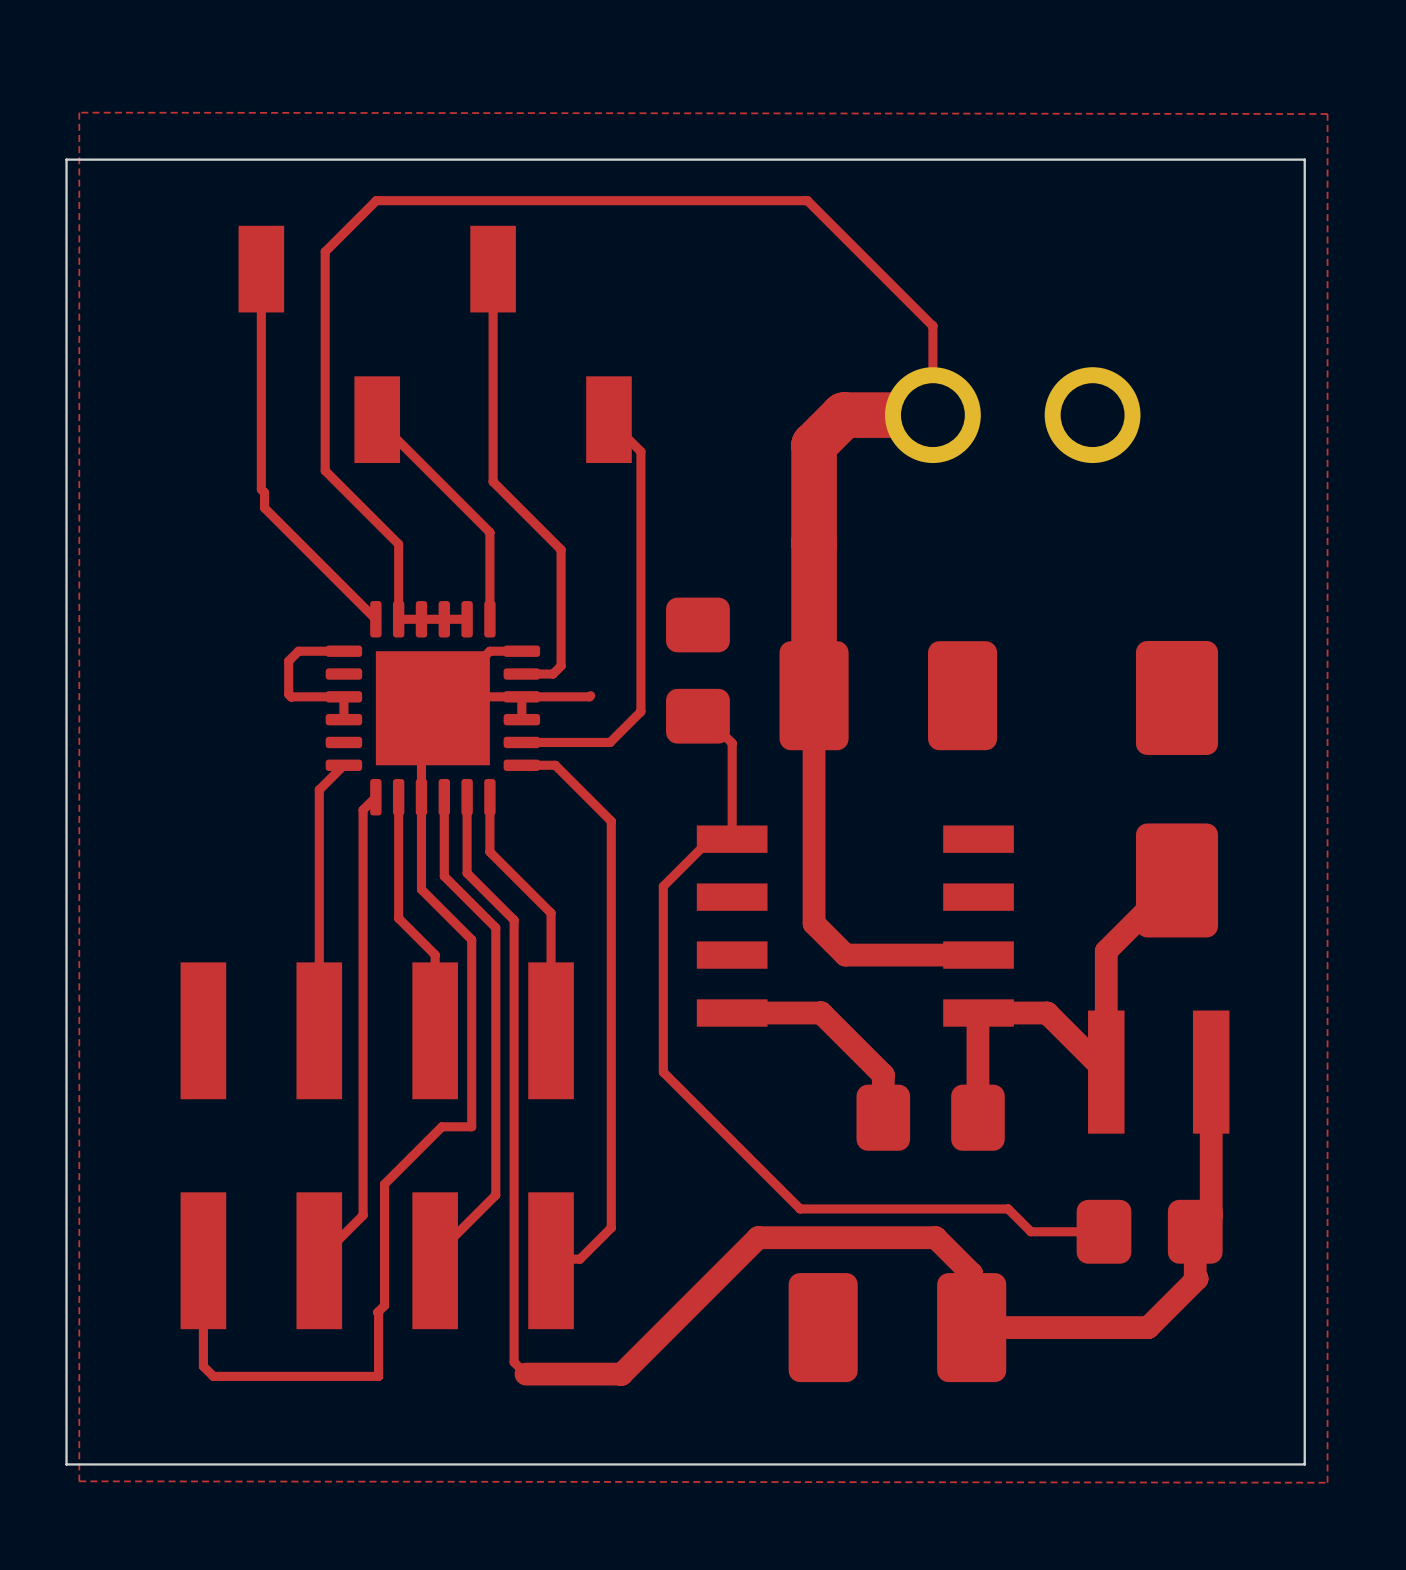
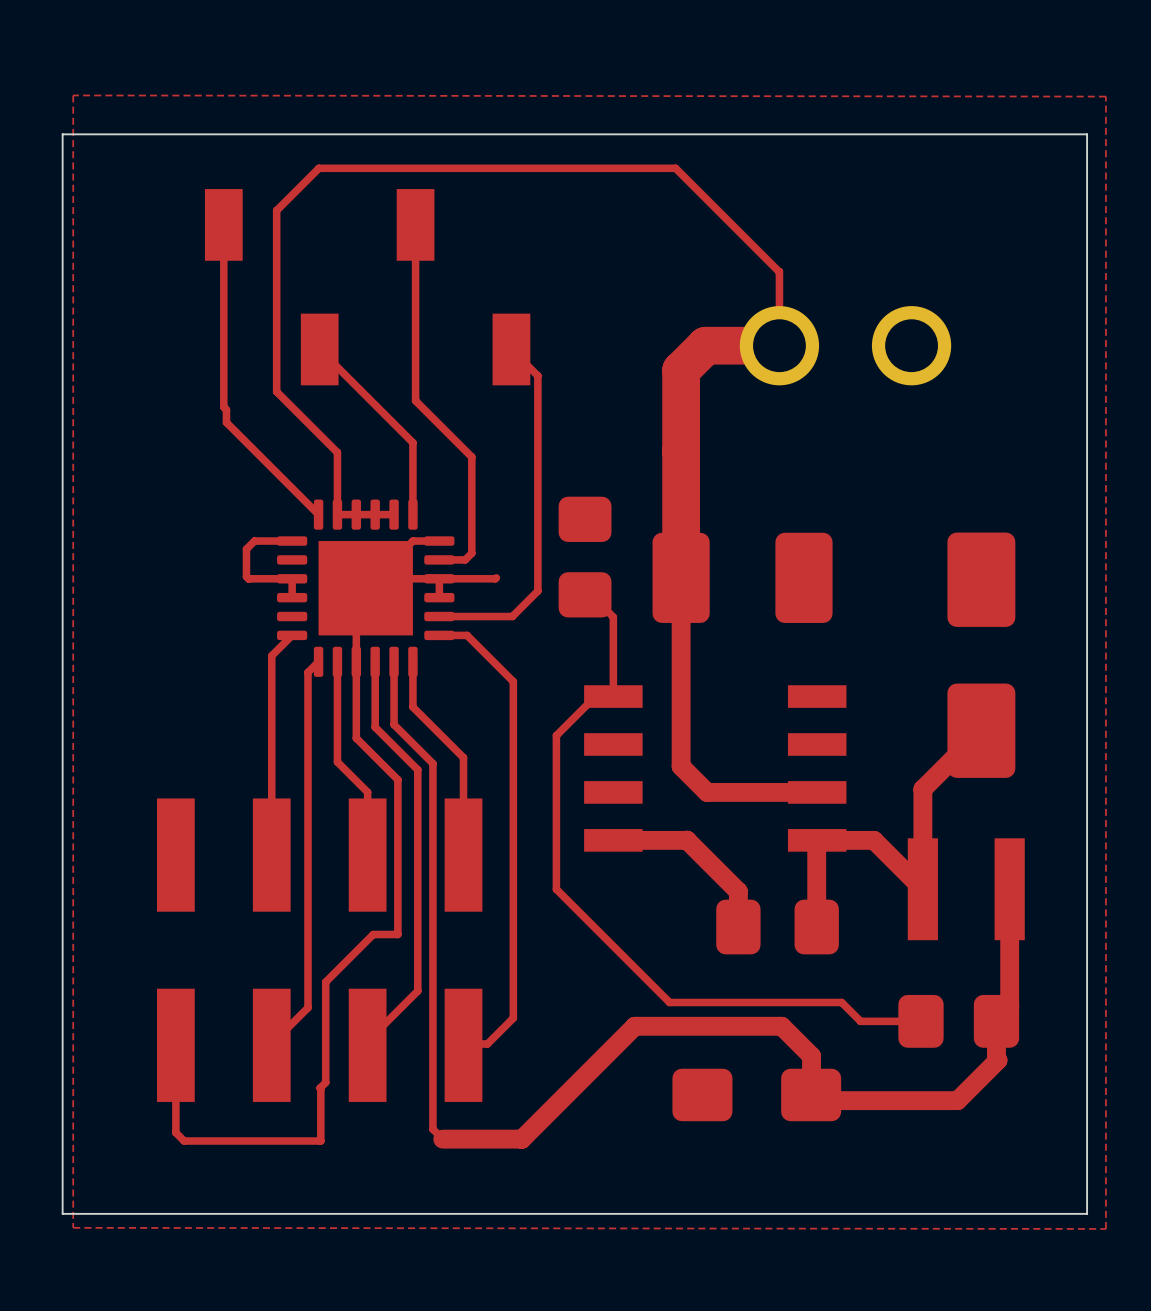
part footprint: [788, 1273, 1007, 1383] -> [672, 1068, 842, 1122]

